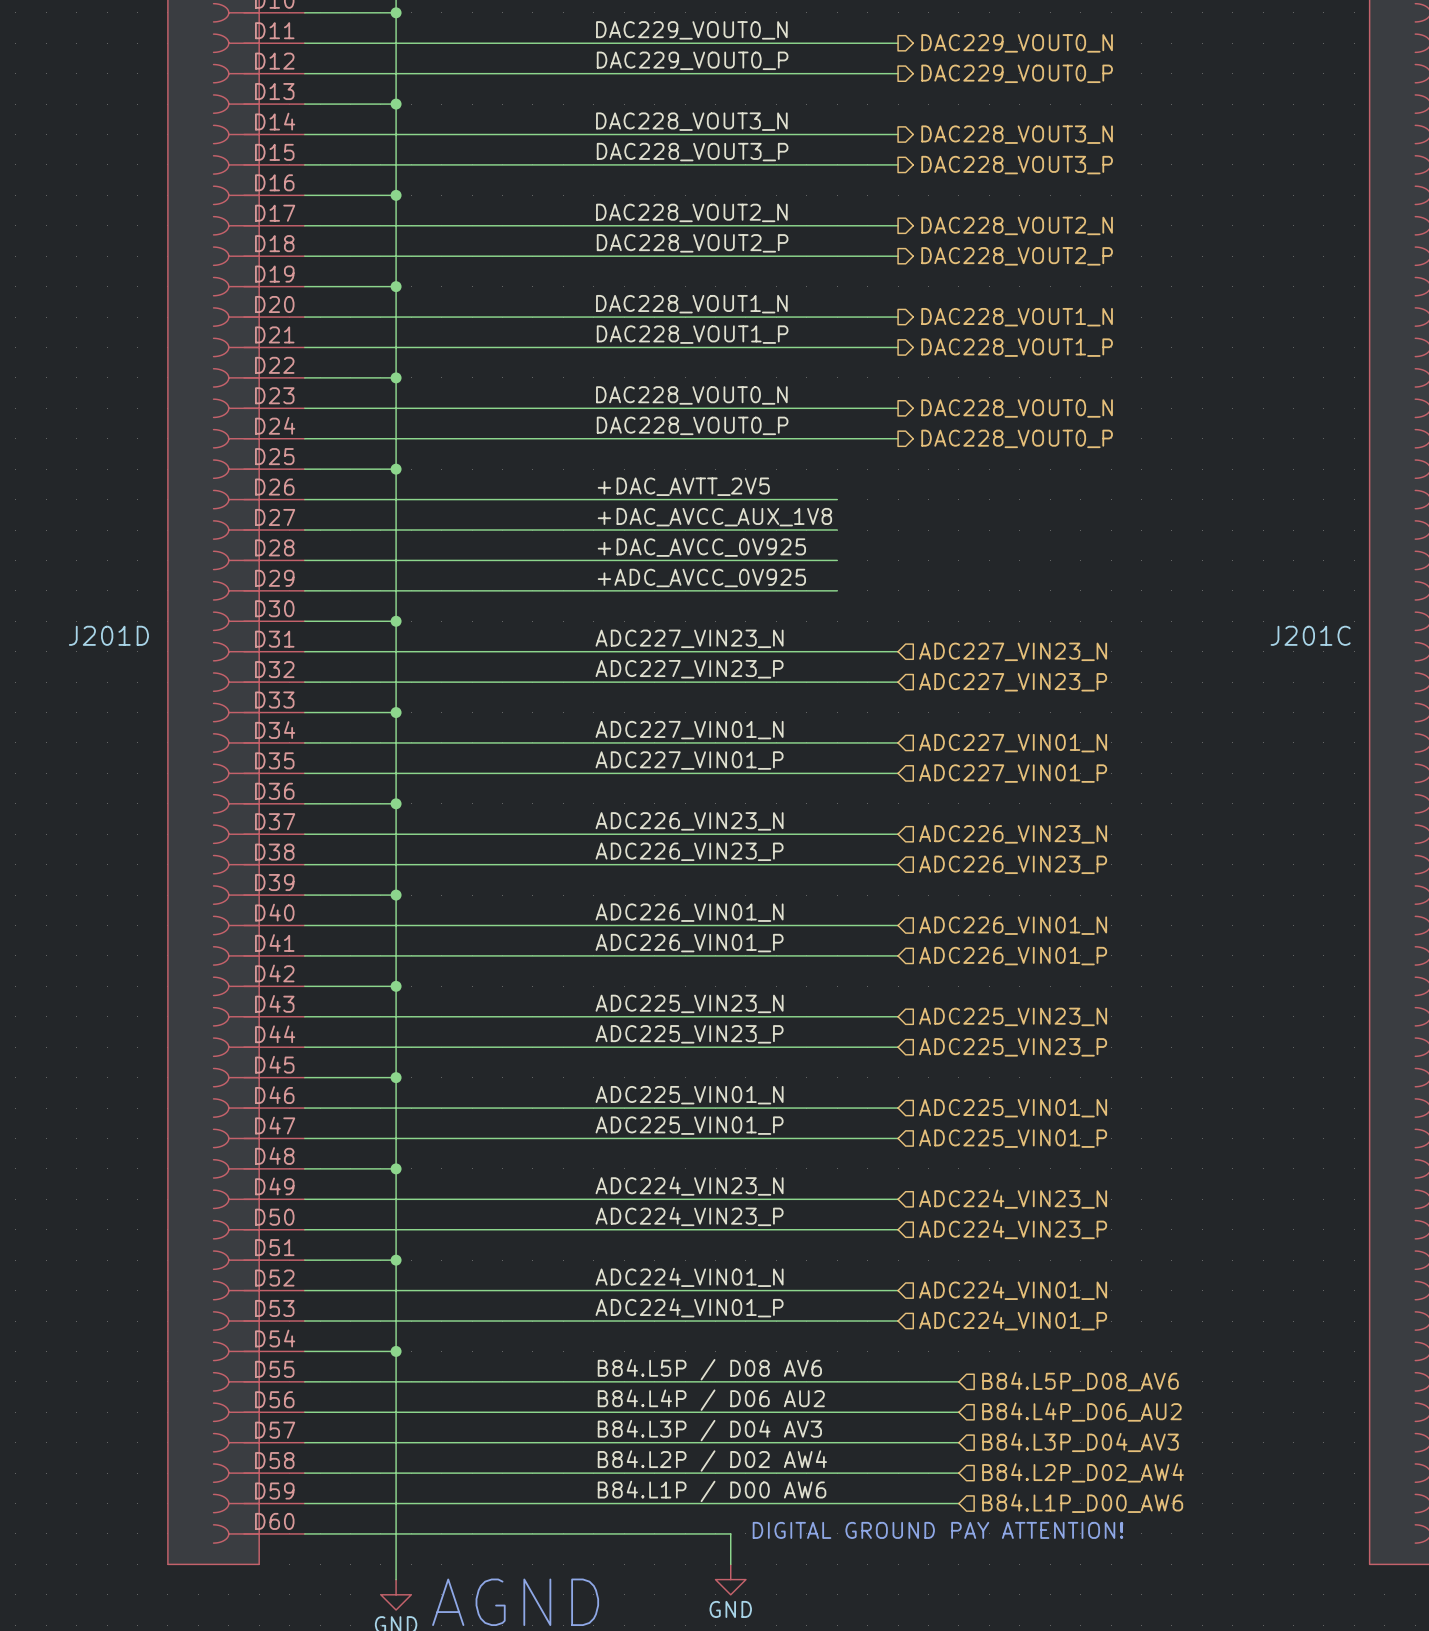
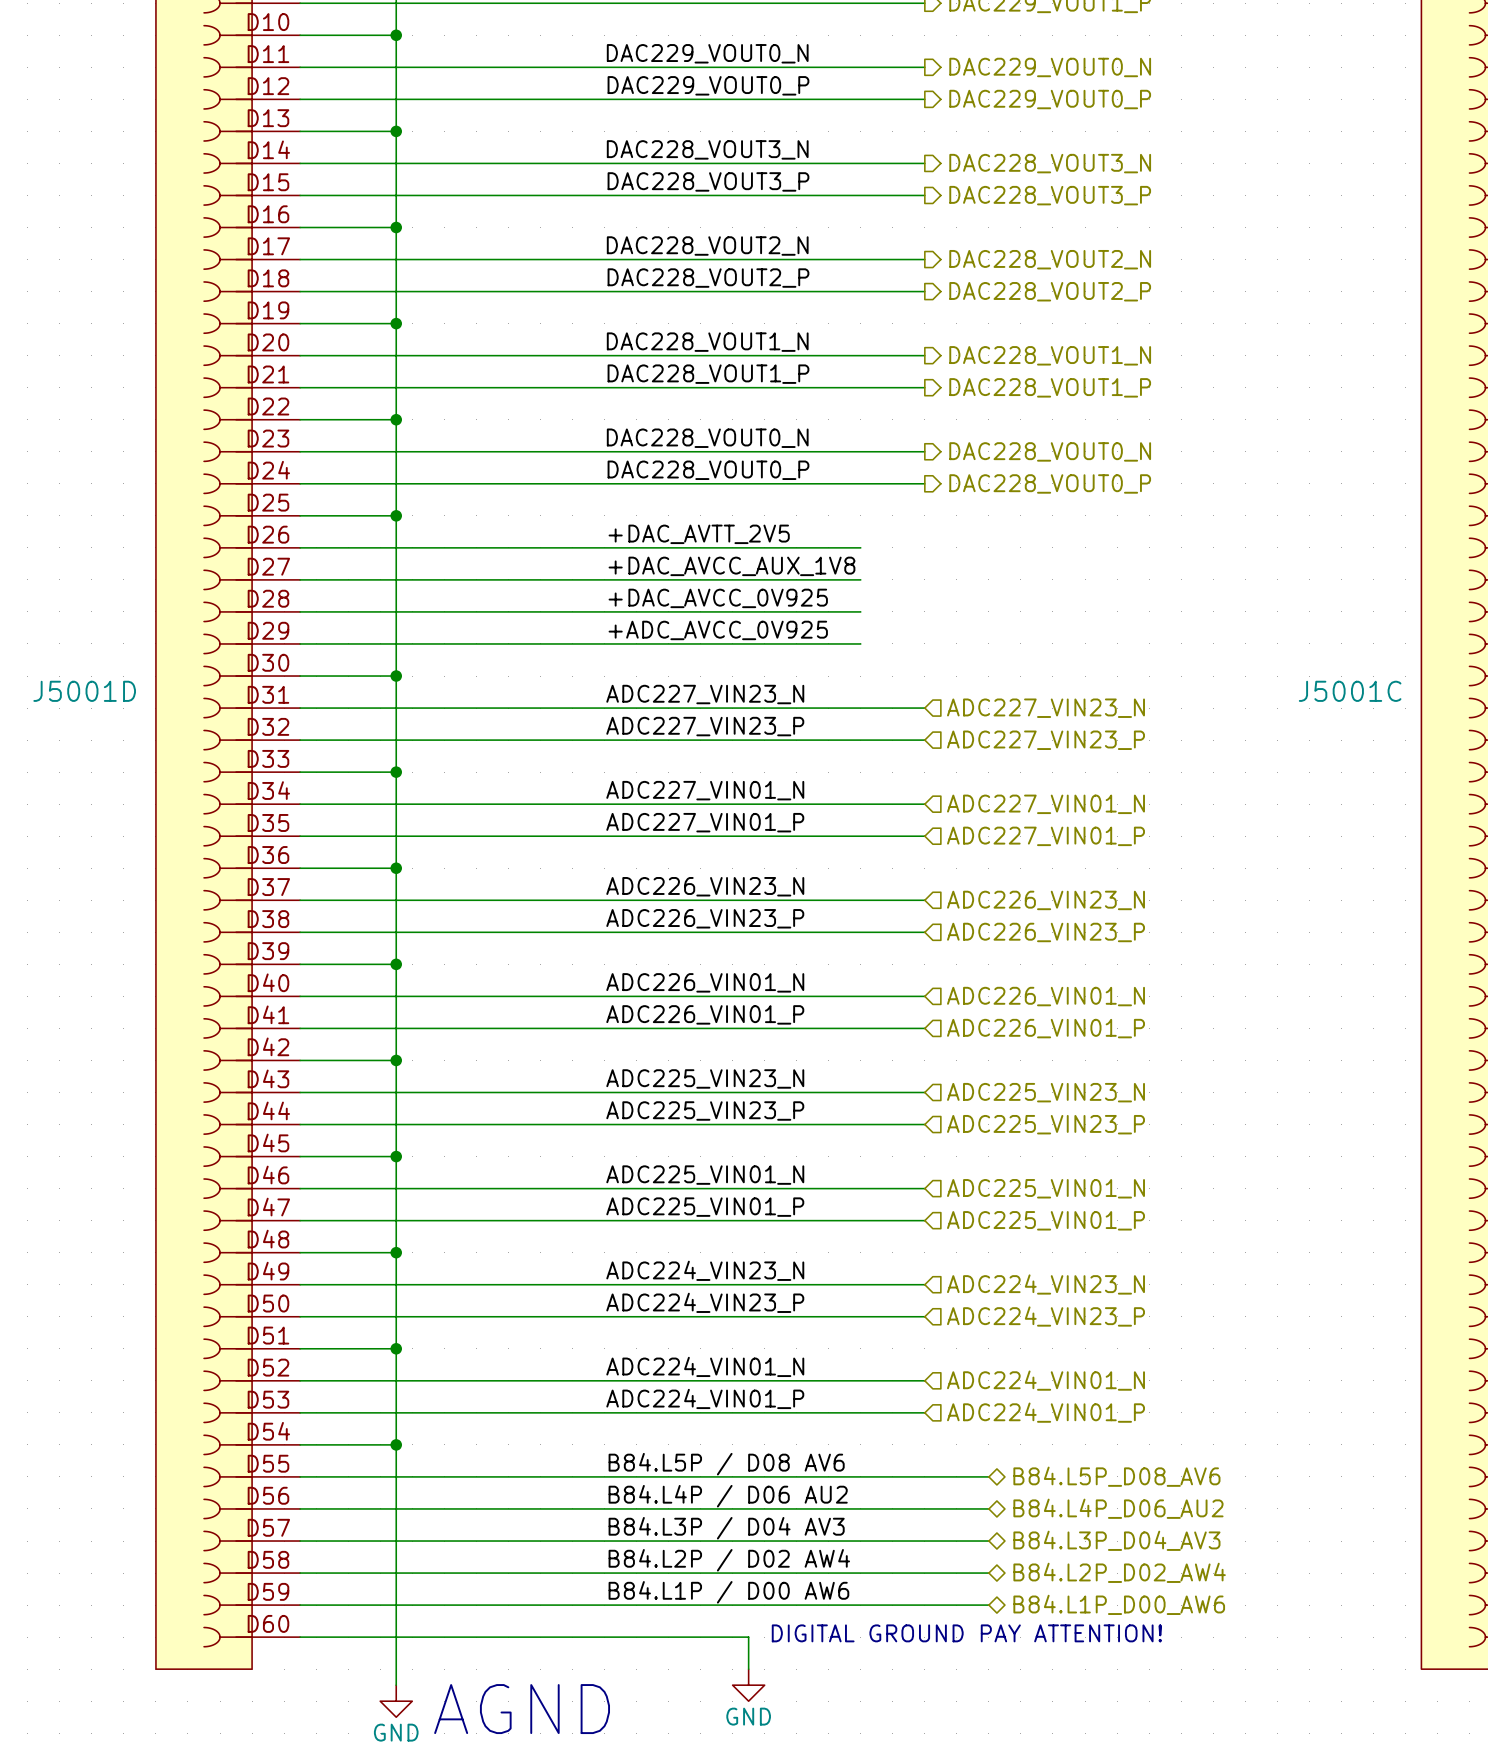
J201D name: J201D (108, 635) -> J5001D (84, 691)
J201C name: J201C (1310, 635) -> J5001C (1350, 691)
hierarchical label shape: input (1080, 1381) -> bidirectional (1116, 1476)
hierarchical label shape: input (1081, 1412) -> bidirectional (1118, 1508)
hierarchical label shape: input (1080, 1442) -> bidirectional (1116, 1540)
hierarchical label shape: input (1083, 1472) -> bidirectional (1119, 1572)
hierarchical label shape: input (1082, 1503) -> bidirectional (1119, 1604)

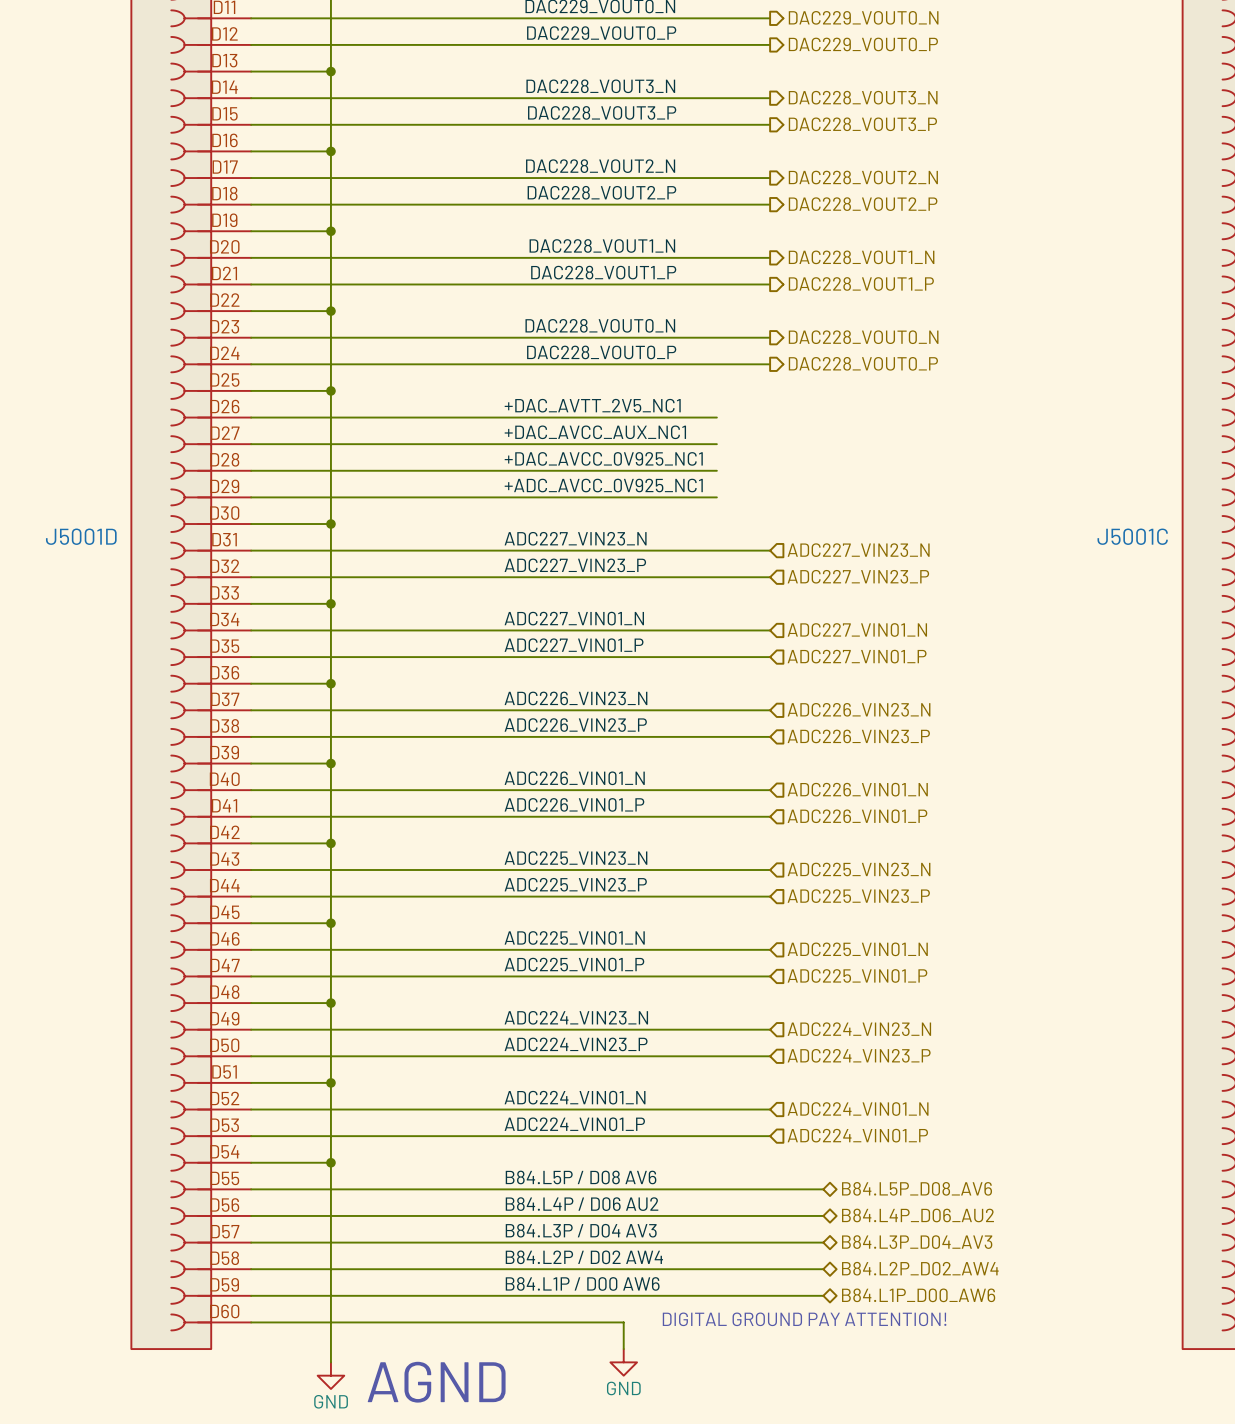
label: +DAC_AVTT_2V5 (699, 534) -> +DAC_AVTT_2V5_NC1 (592, 405)
label: +DAC_AVCC_AUX_1V8 (731, 566) -> +DAC_AVCC_AUX_NC1 (595, 432)
label: +DAC_AVCC_0V925 (718, 598) -> +DAC_AVCC_0V925_NC1 (603, 458)
label: +ADC_AVCC_0V925 (718, 630) -> +ADC_AVCC_0V925_NC1 (603, 485)

